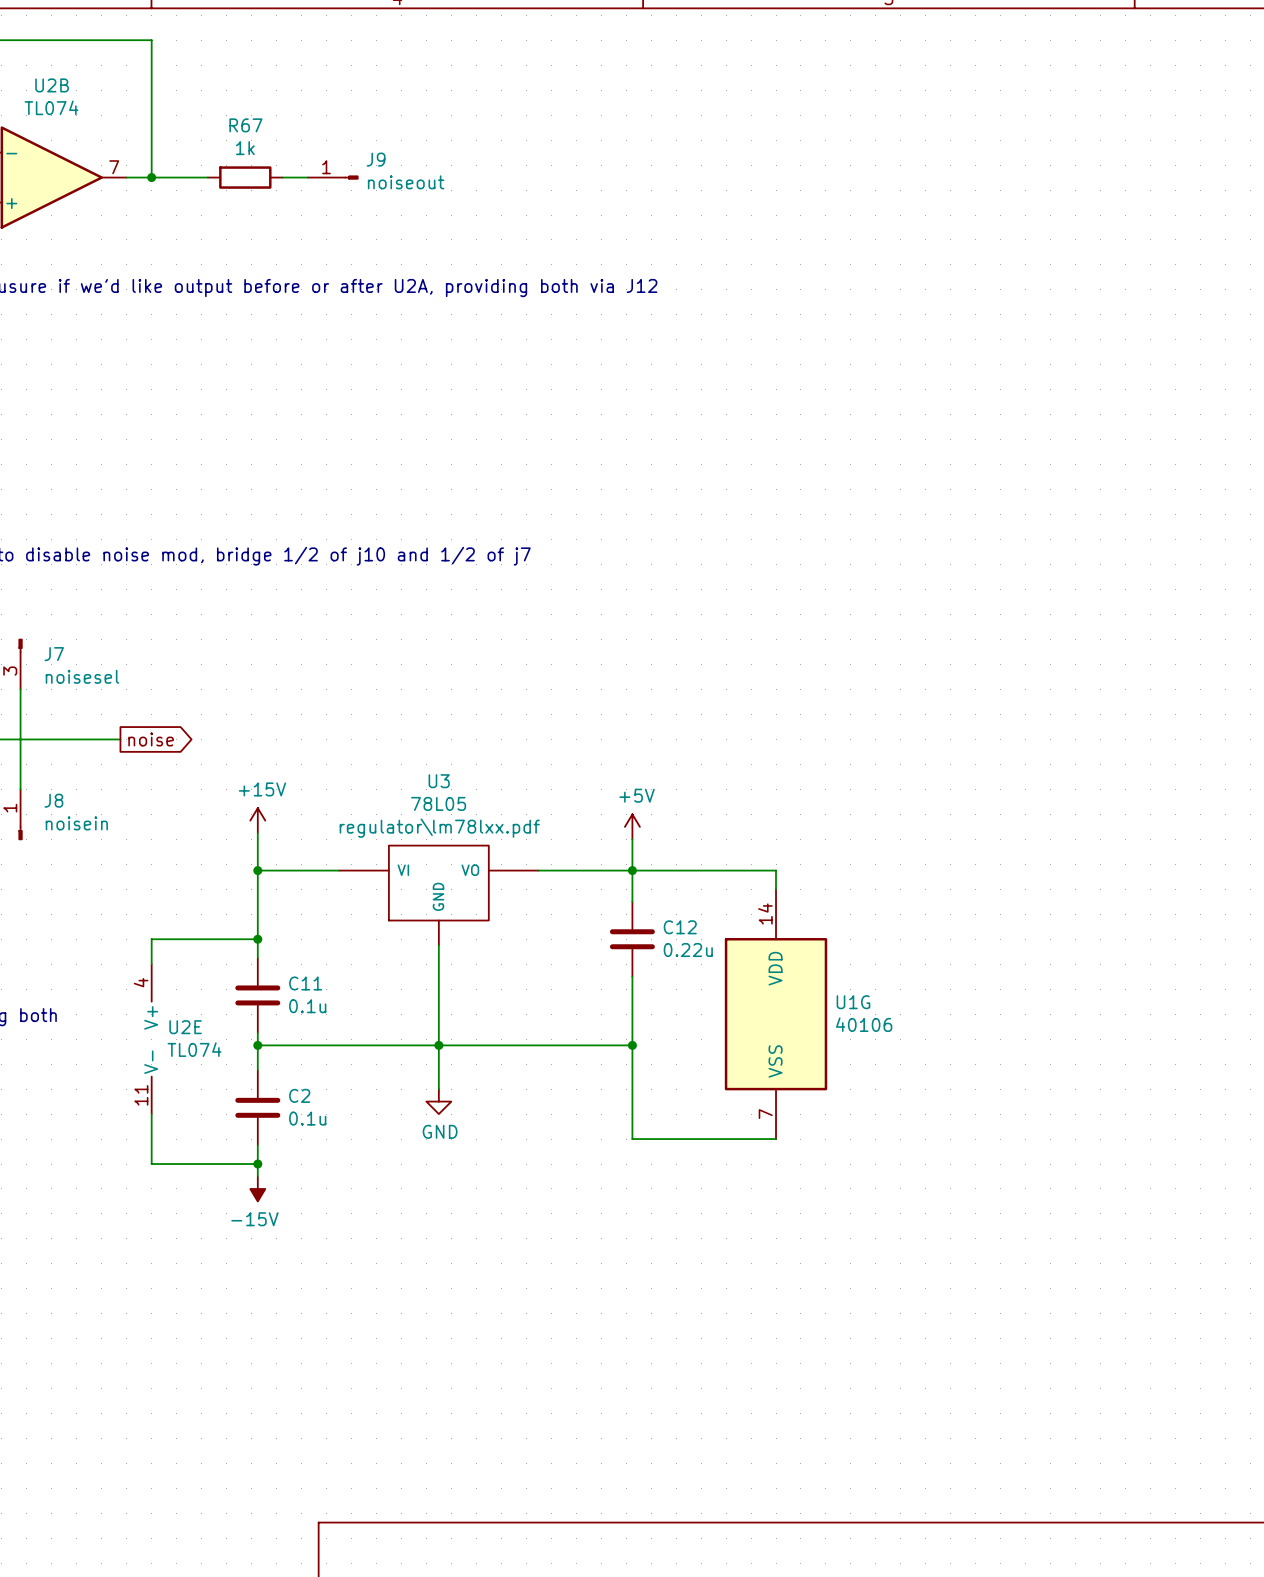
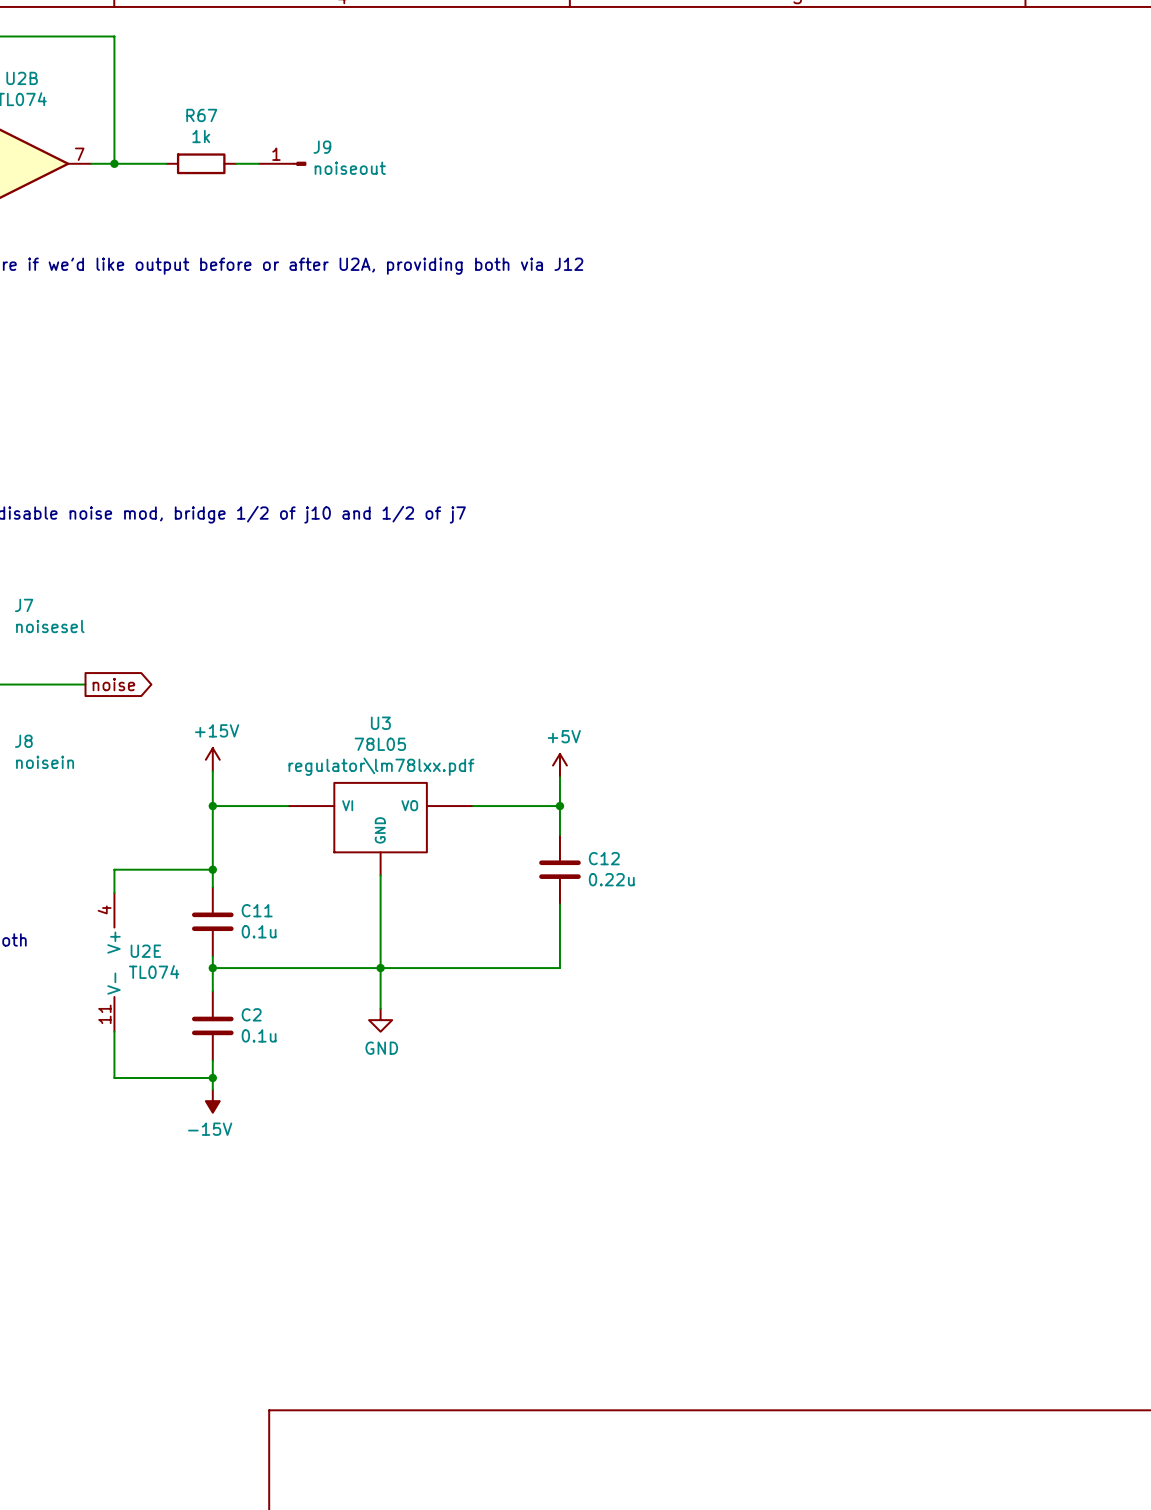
wire: (632, 870) (776, 870) (776, 889) -> none
U1G: 40106 (776, 1014) -> none
wire: (632, 1045) (632, 1139) (776, 1139) -> none
junction: (632, 1045) -> none

